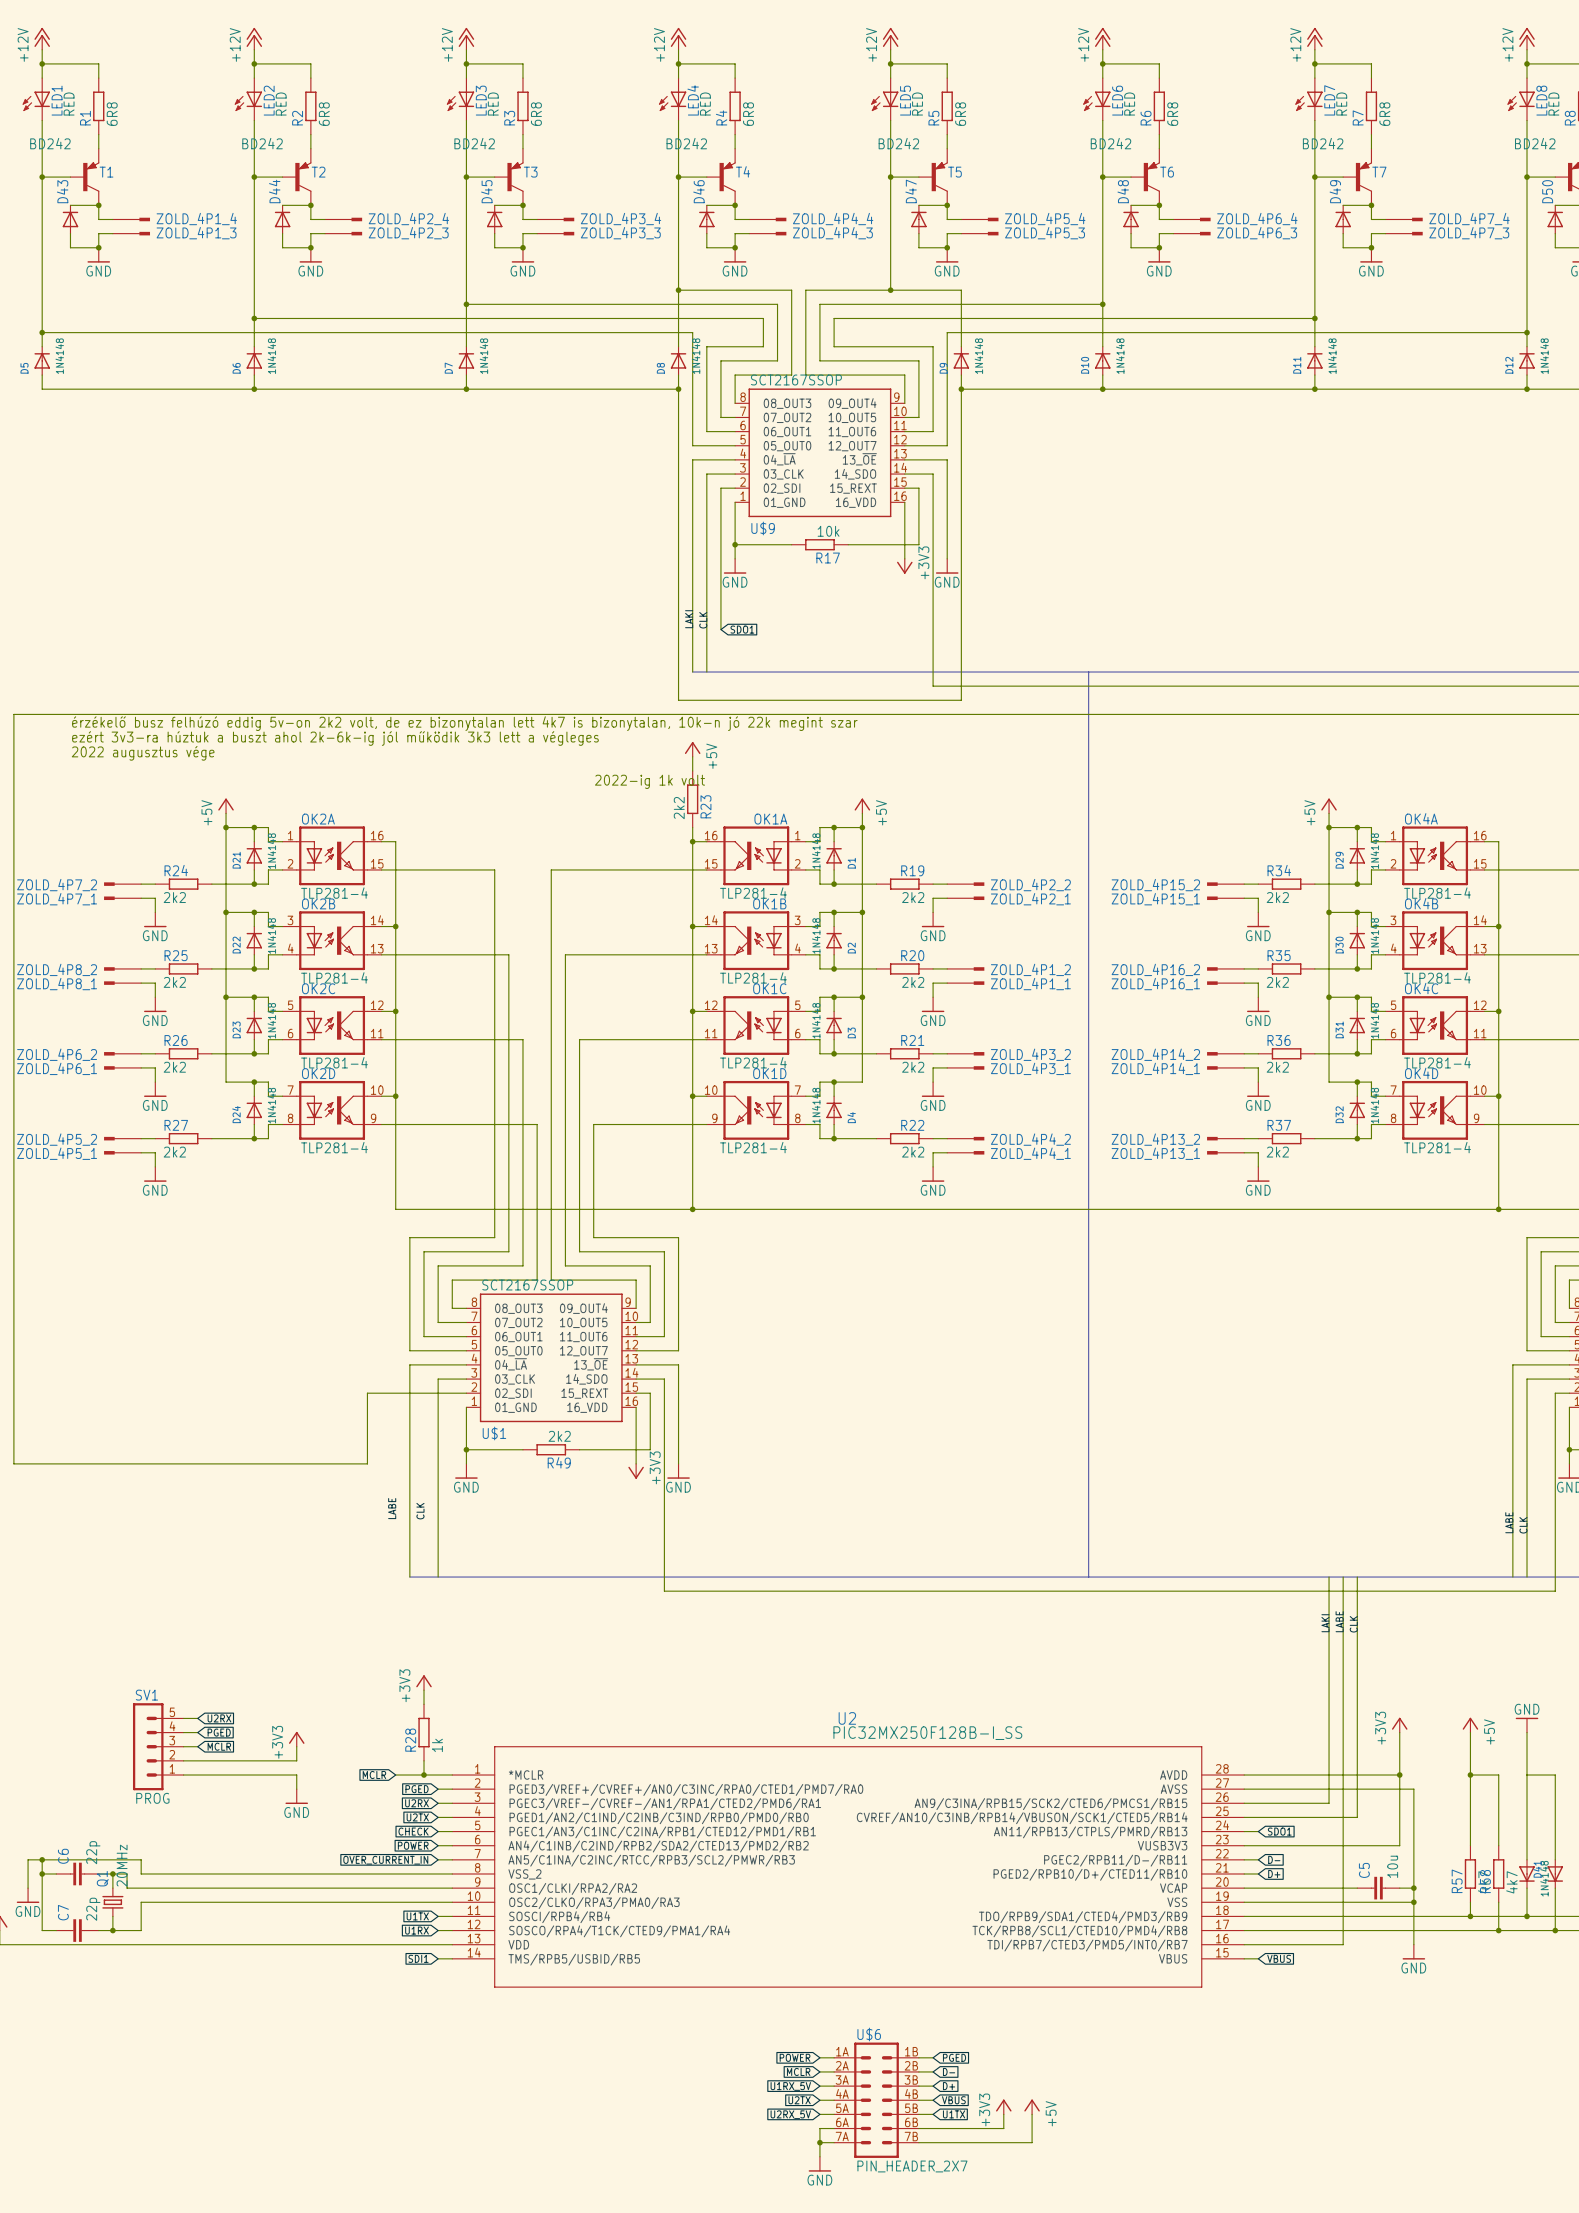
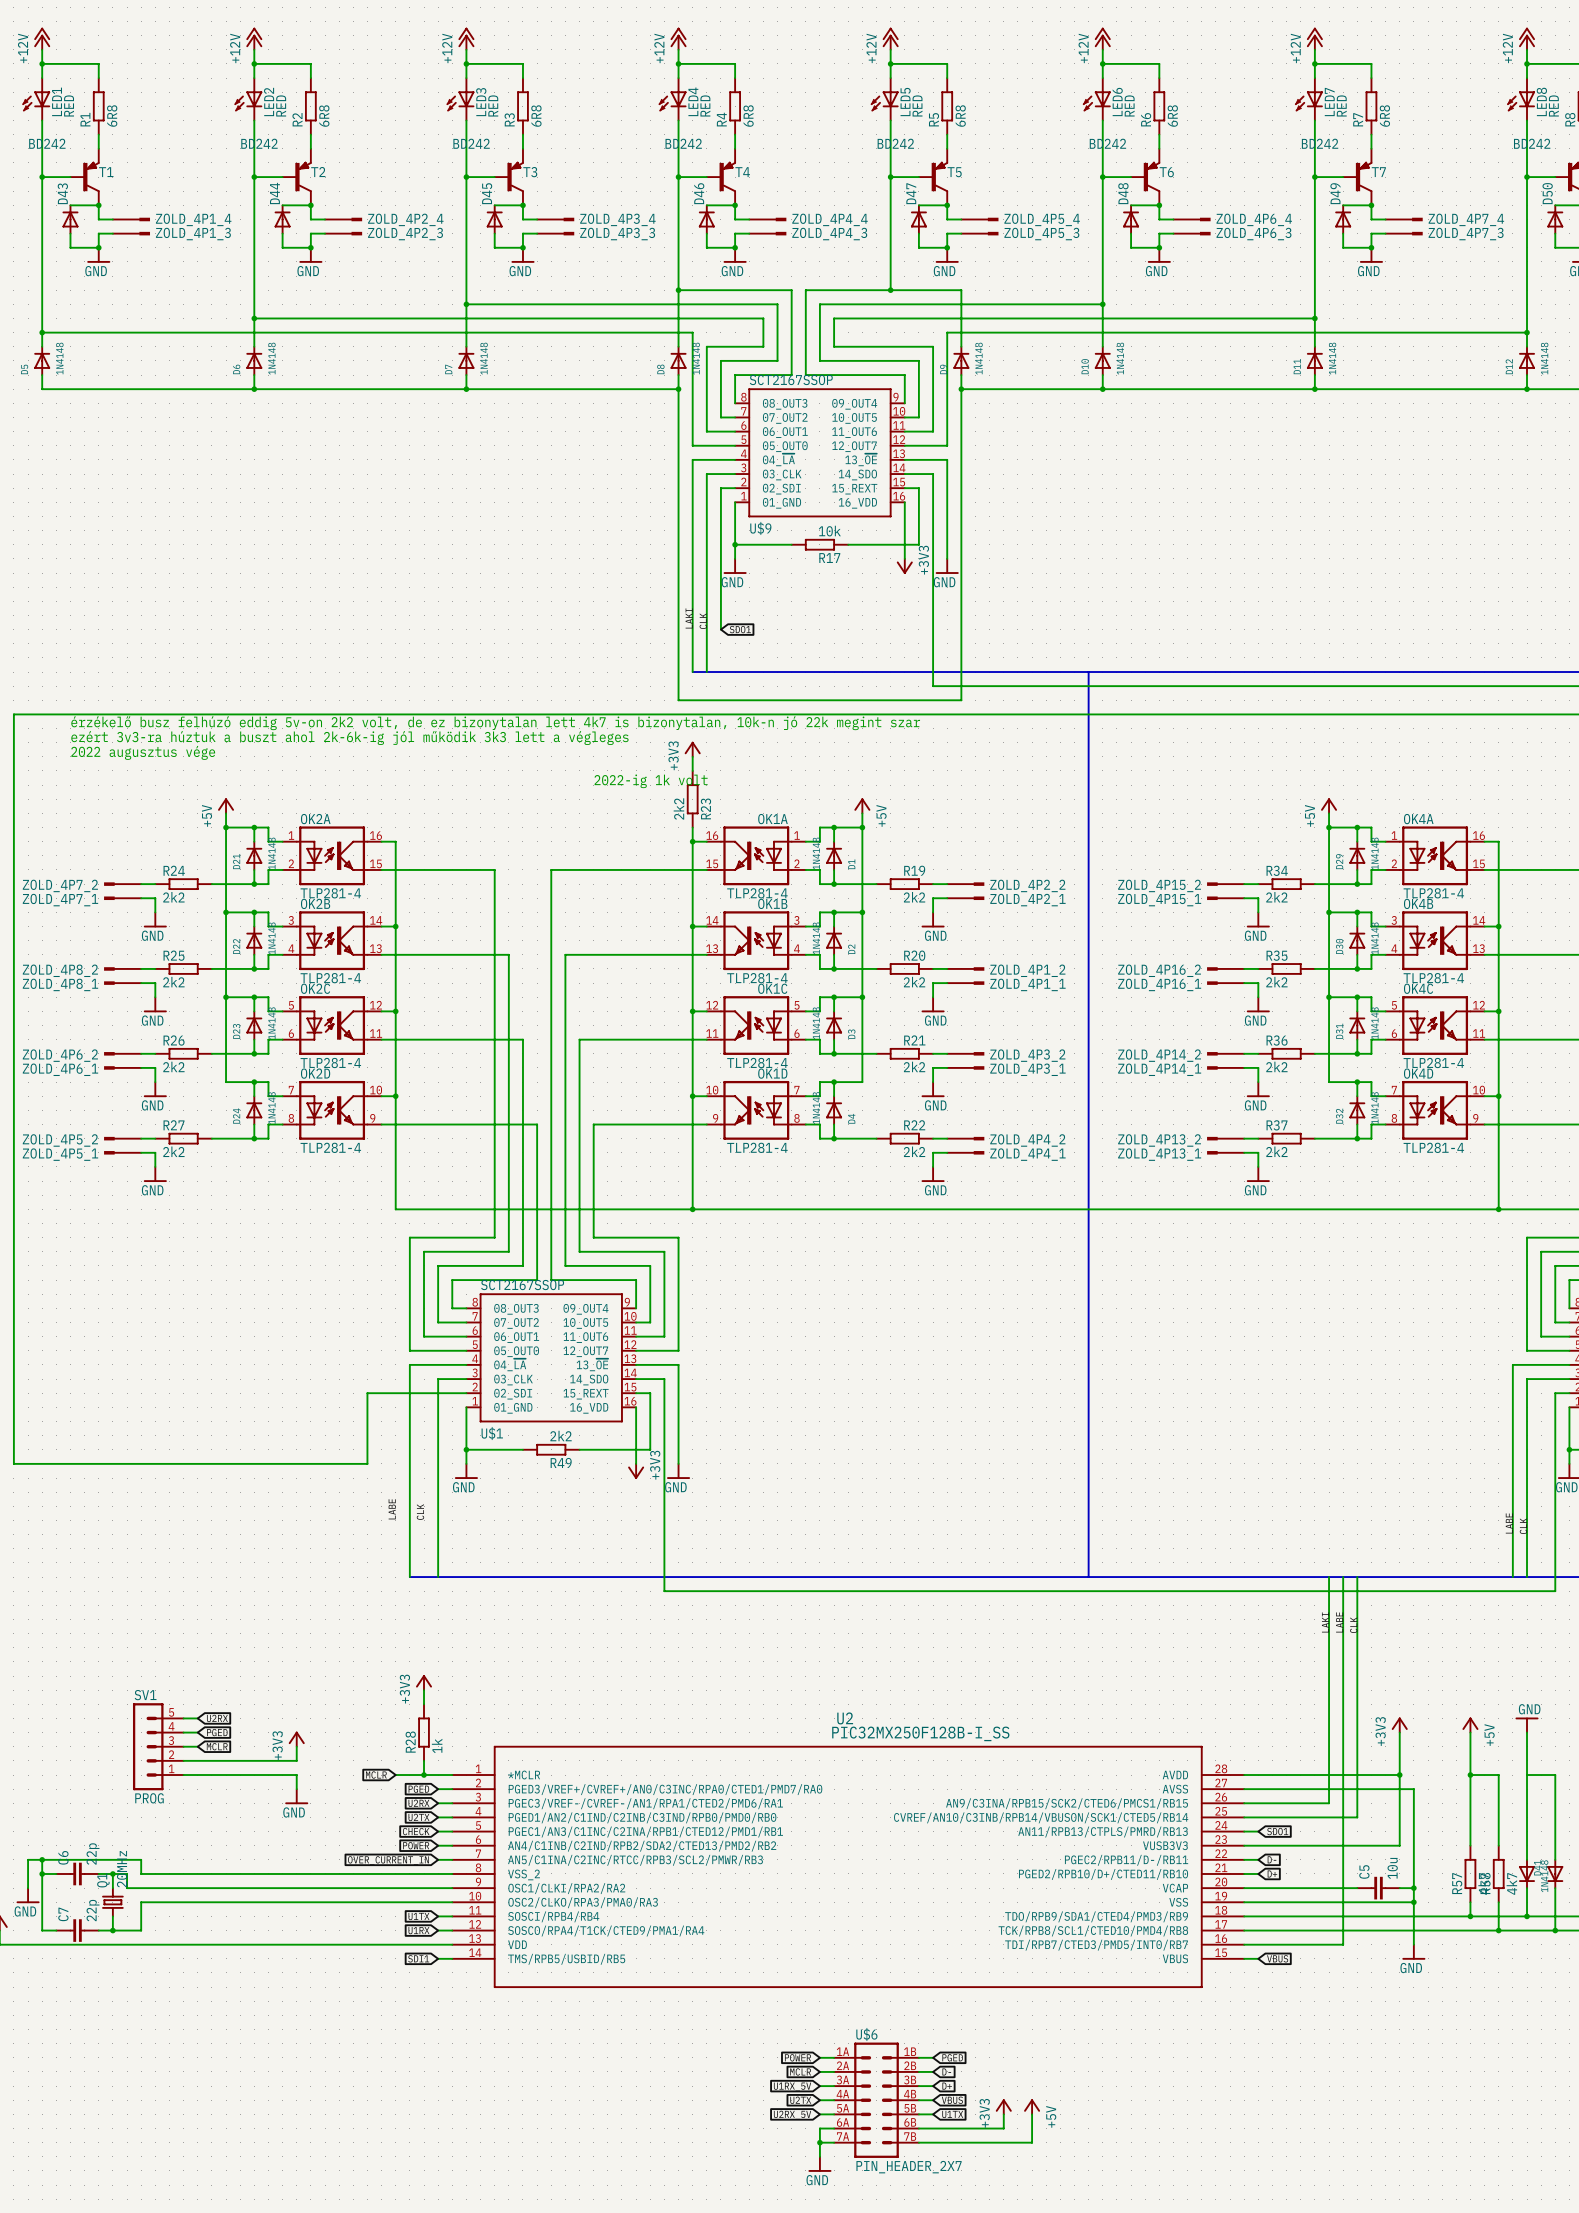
power symbol: +5V (692, 749) -> +3V3 (692, 749)

